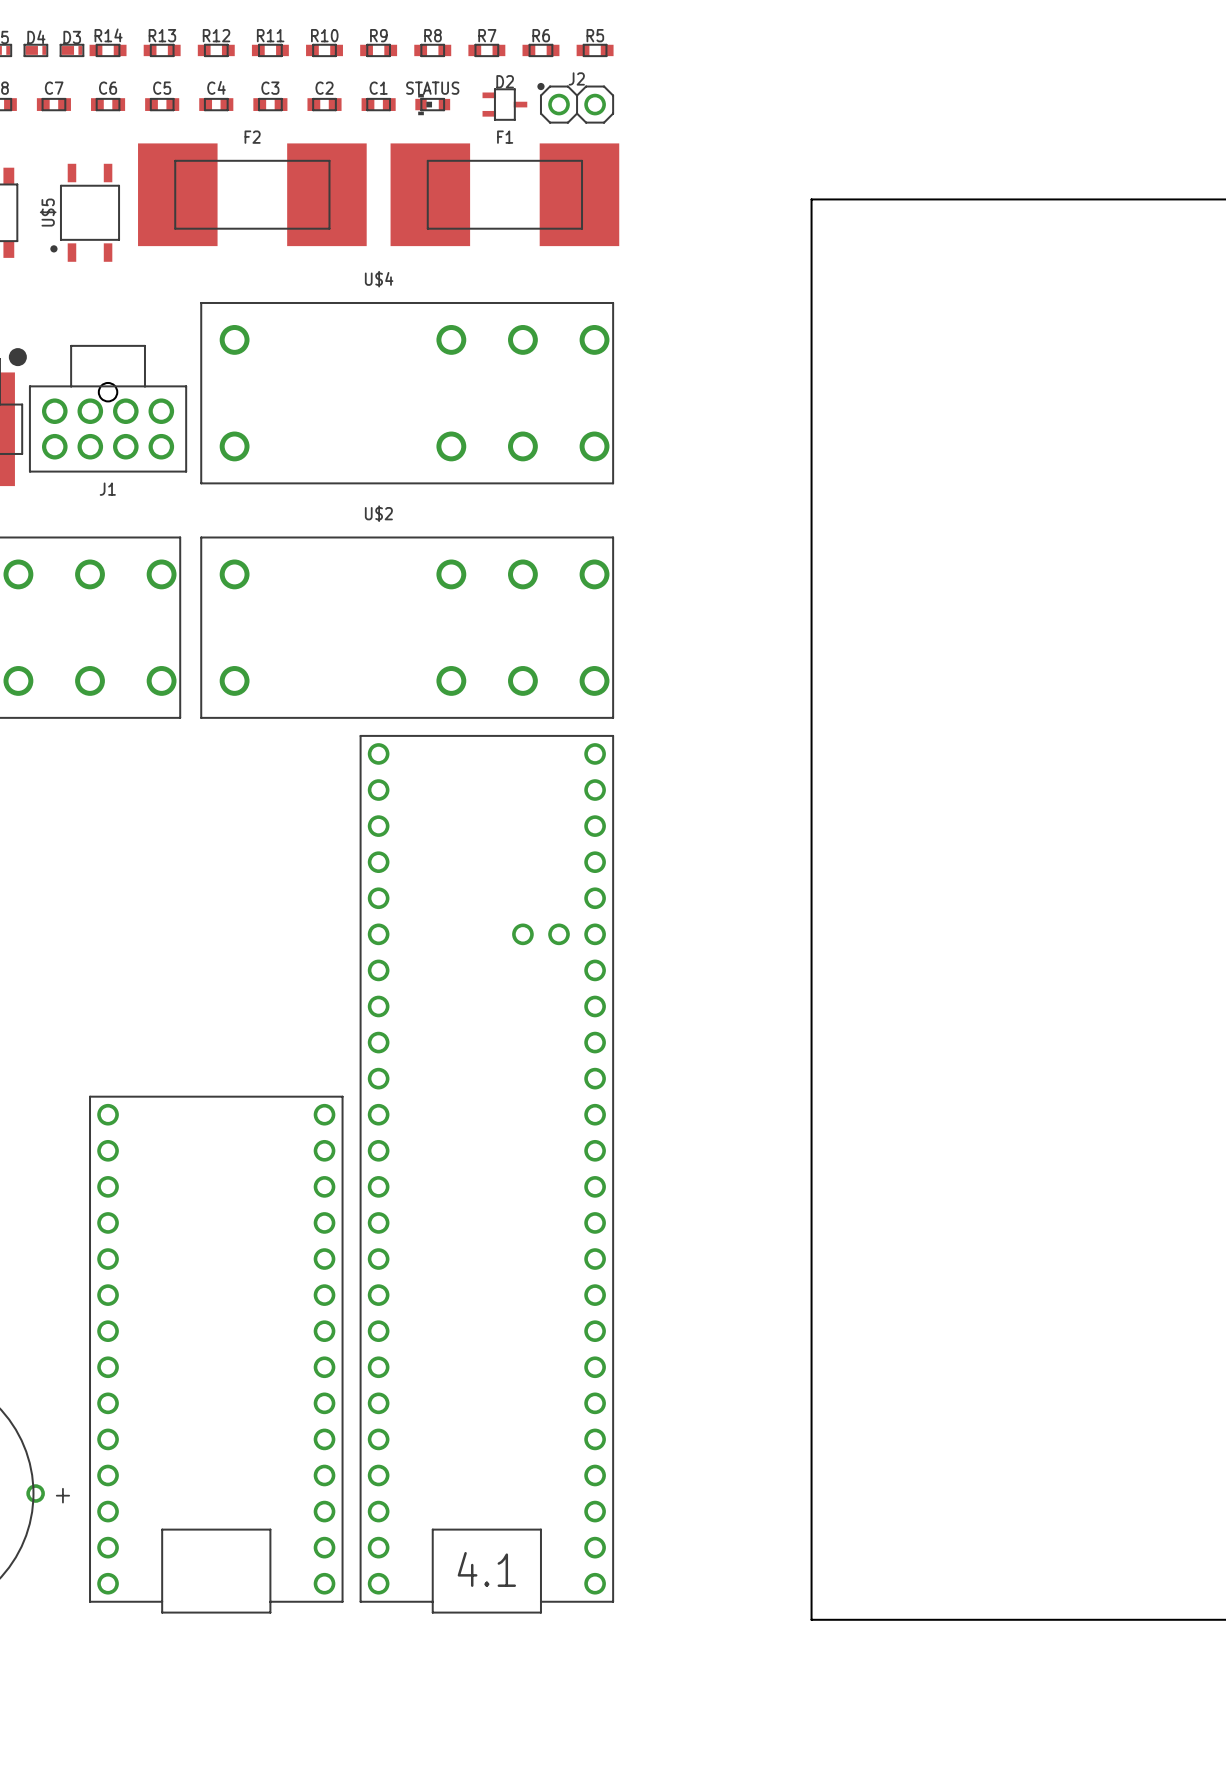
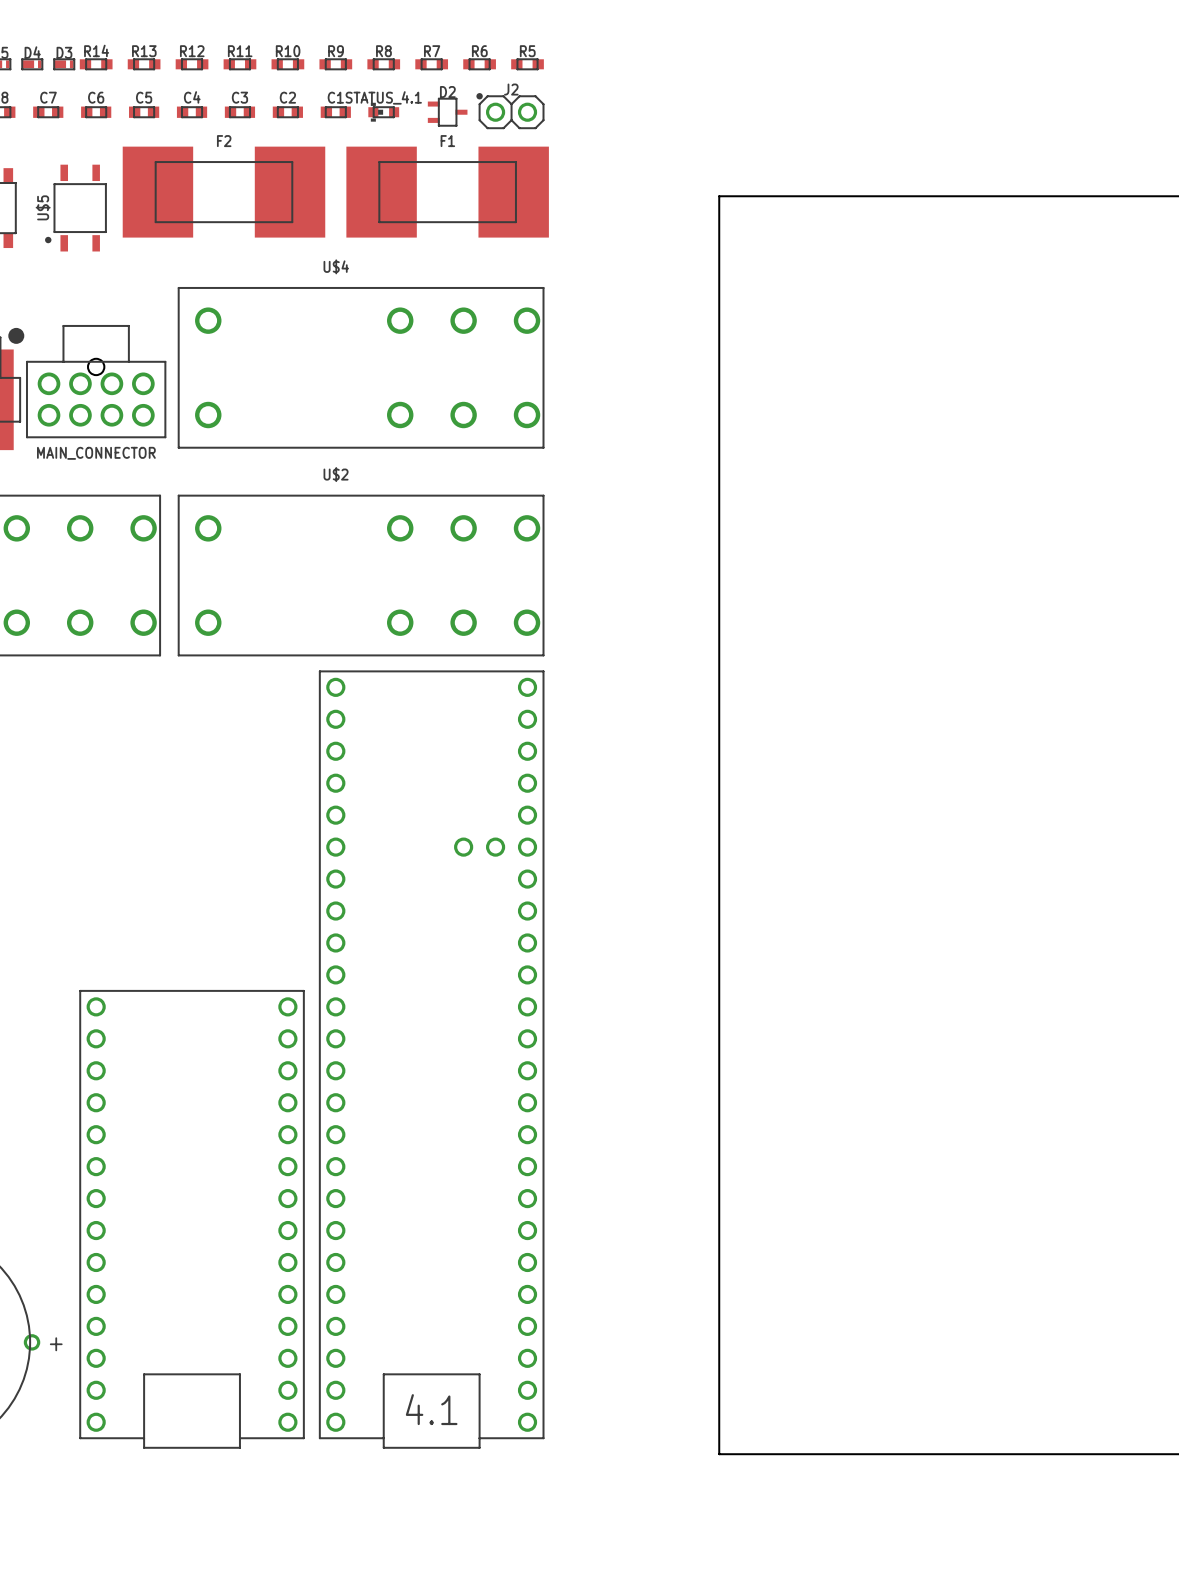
STATUS name: STATUS (432, 88) -> STATUS_4.1 (383, 97)
J1 name: J1 (107, 489) -> MAIN_CONNECTOR (96, 453)

